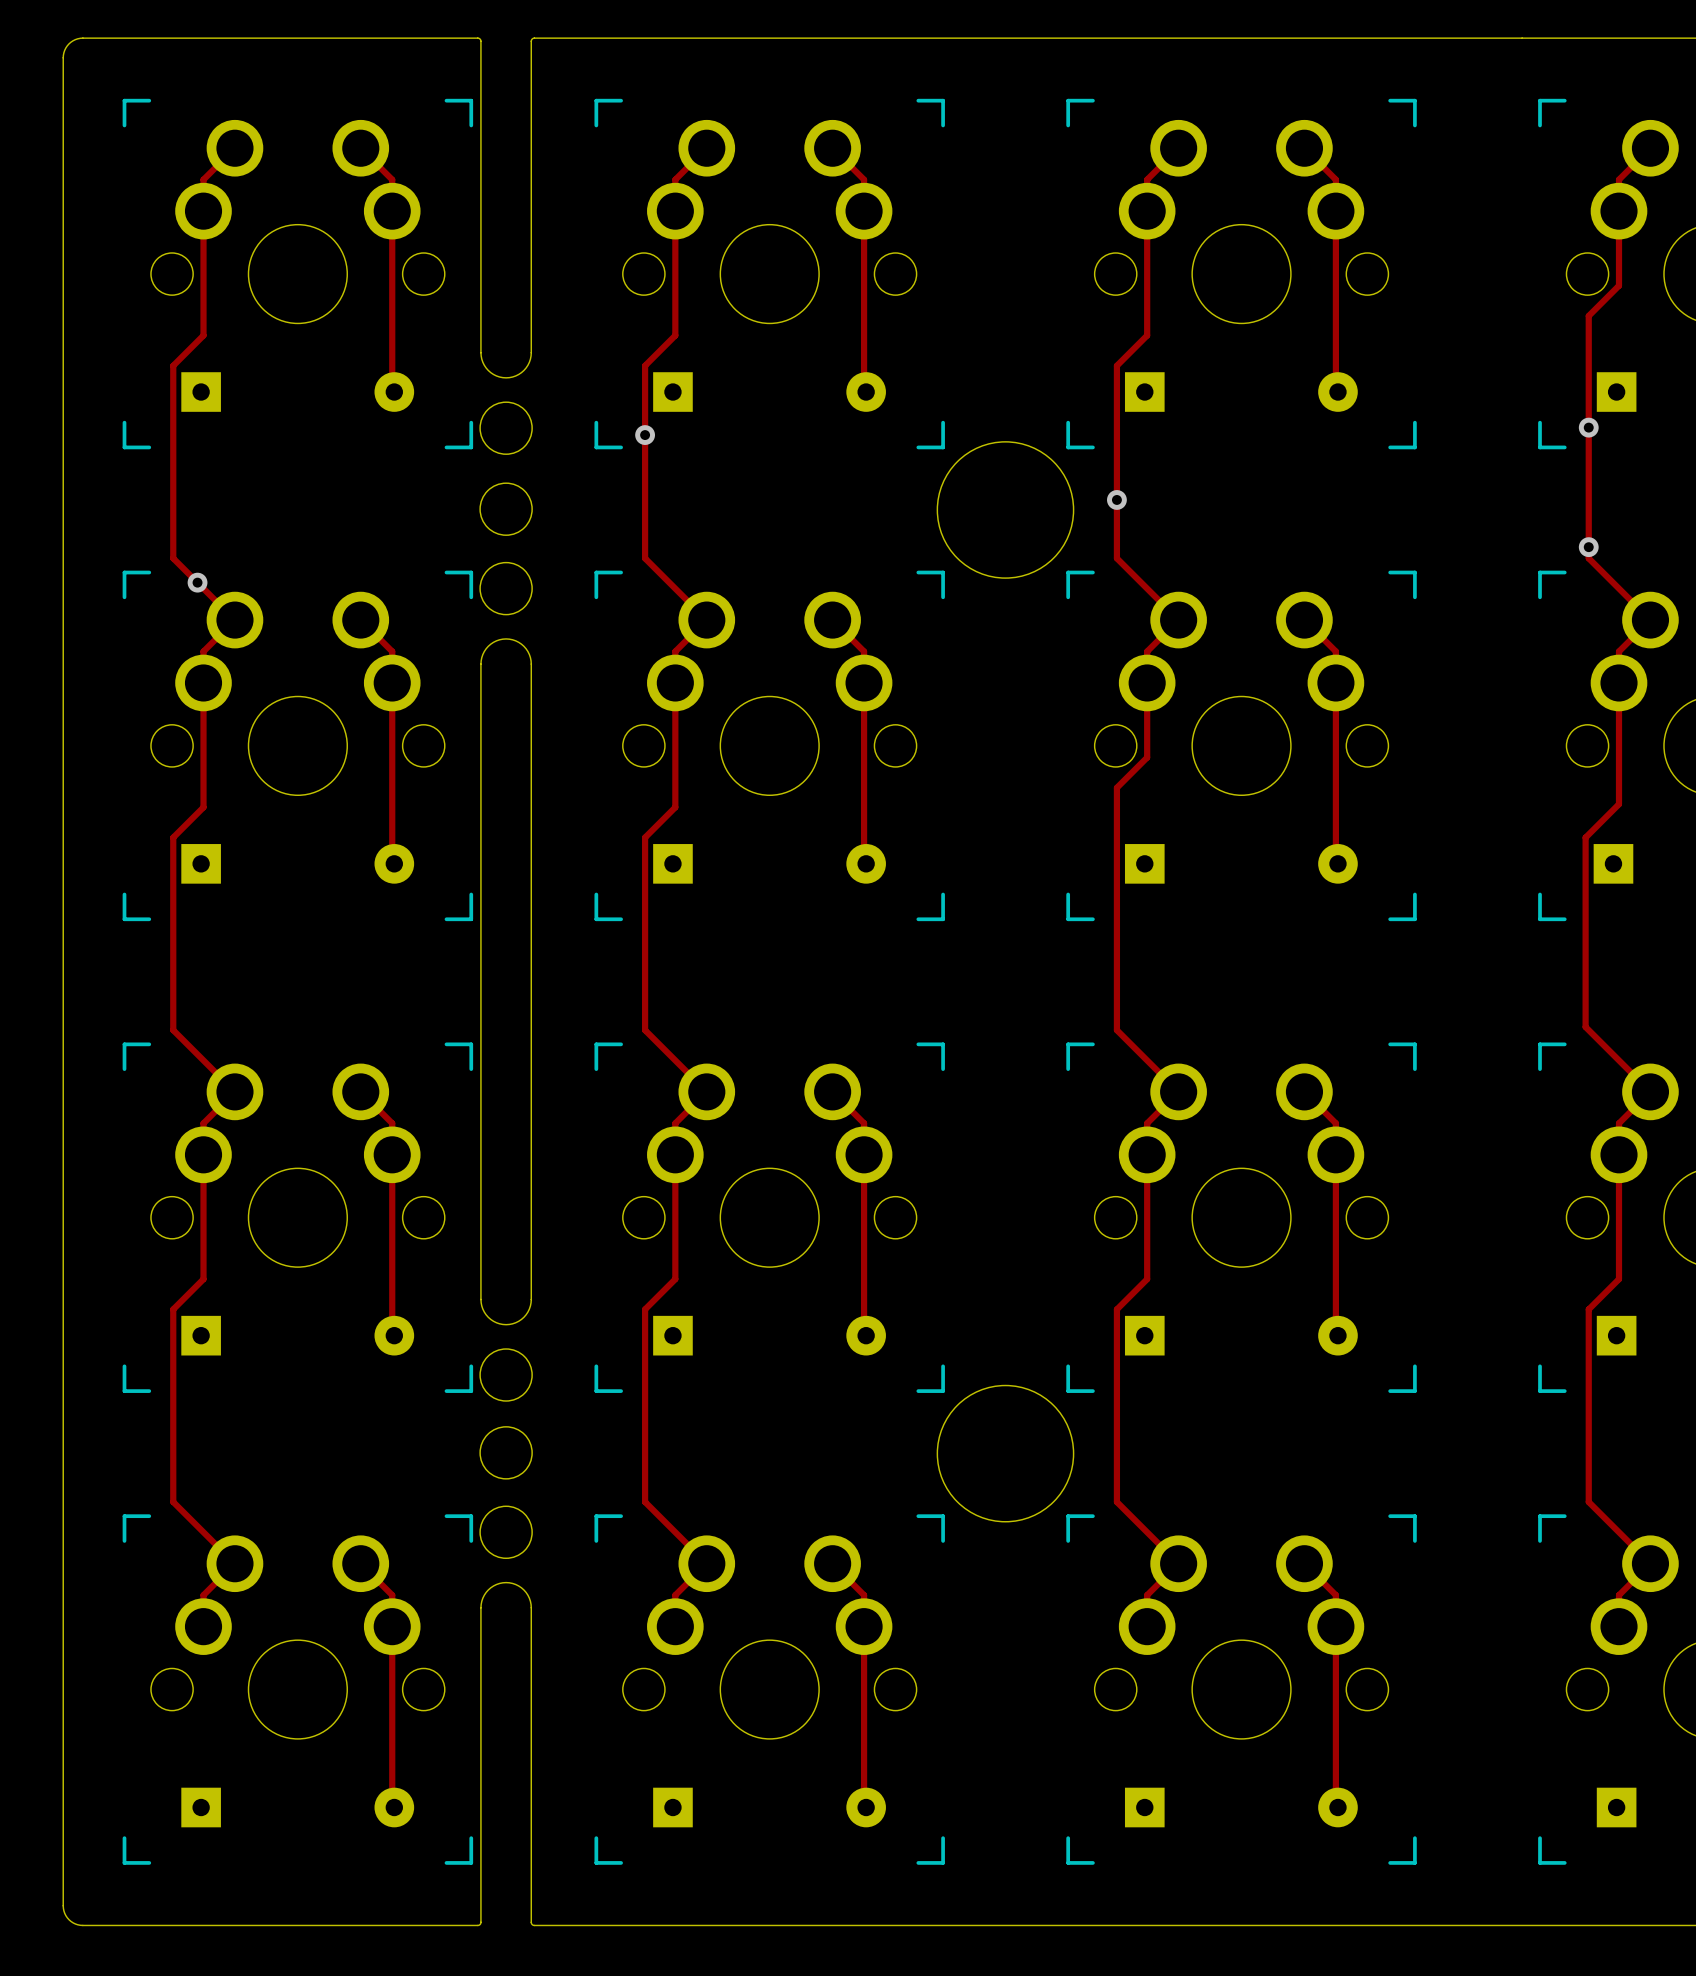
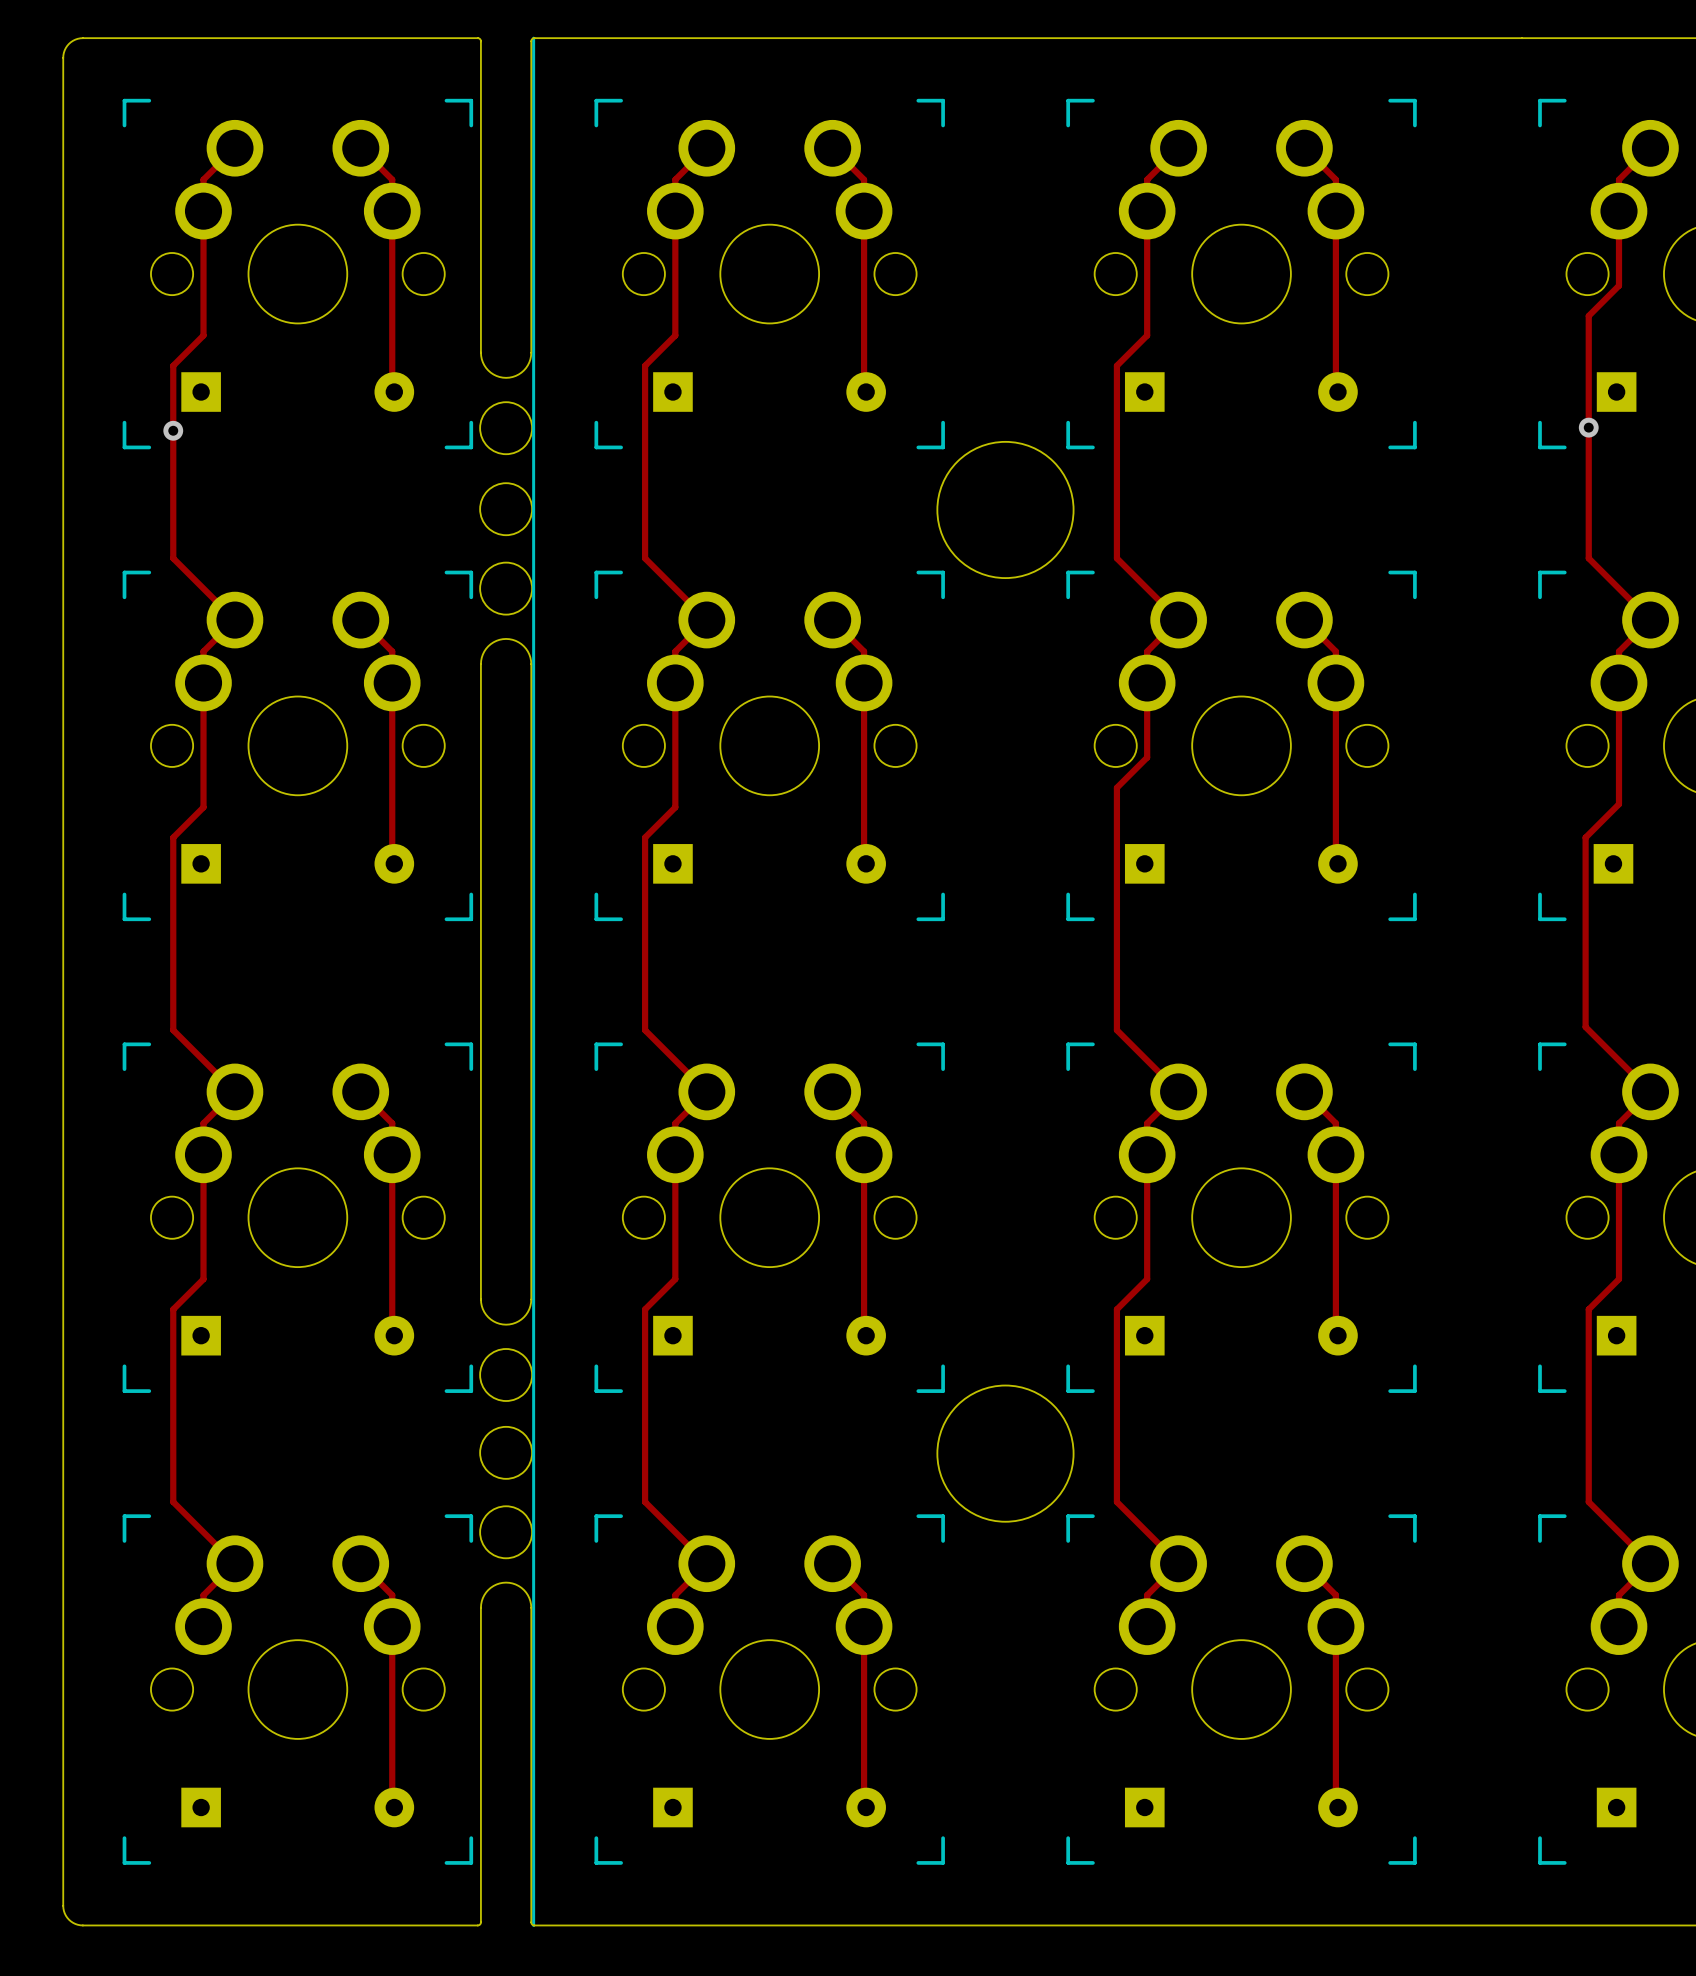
line: none -> (533, 38) (533, 1925)
via: none -> (173, 430)
via: (645, 435) -> none
via: (1116, 499) -> none
via: (1588, 547) -> none
via: (197, 582) -> none

